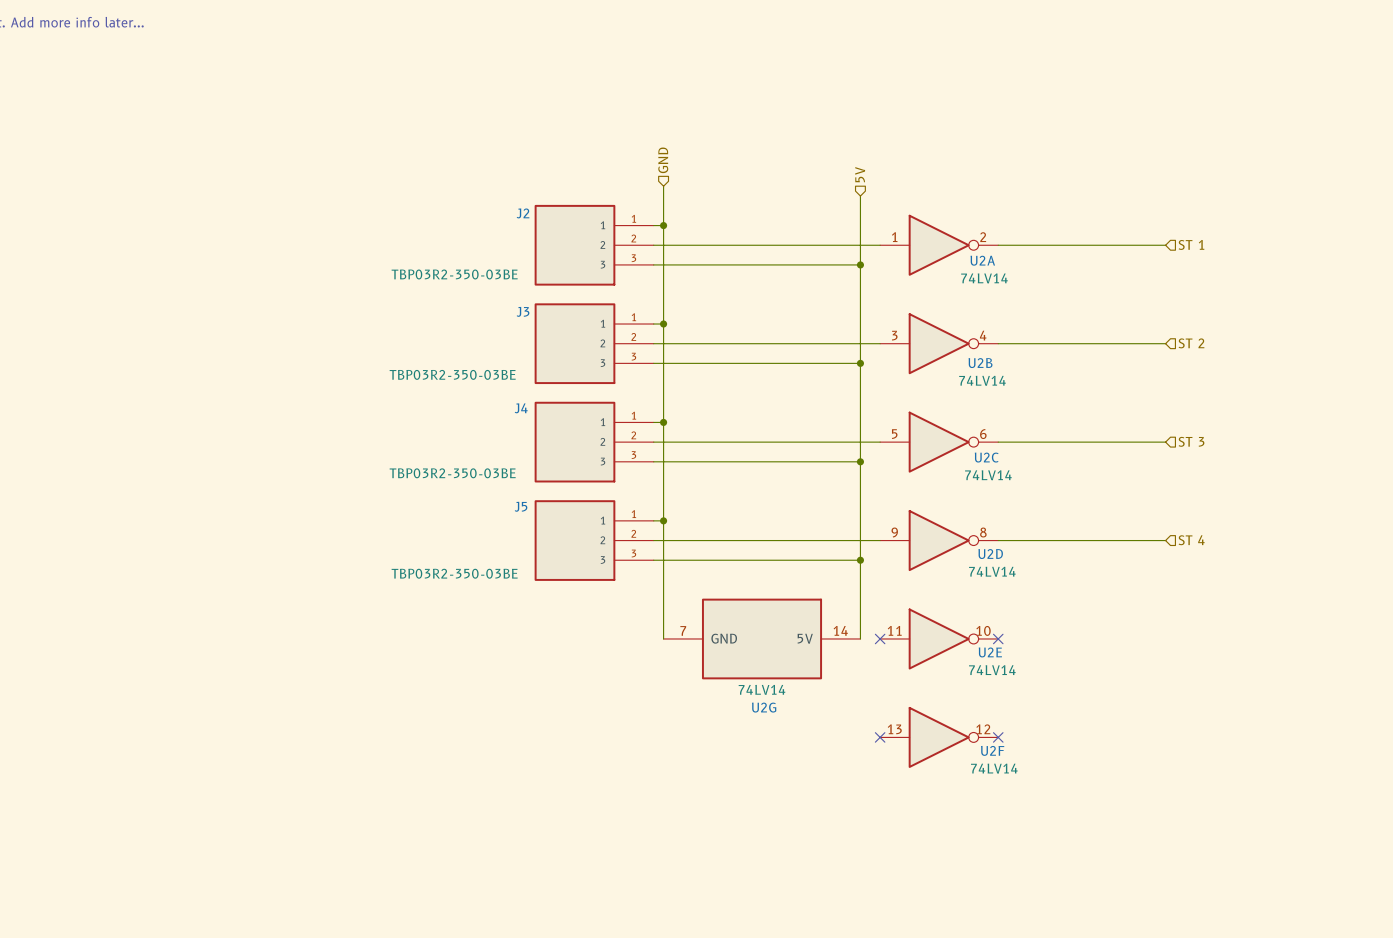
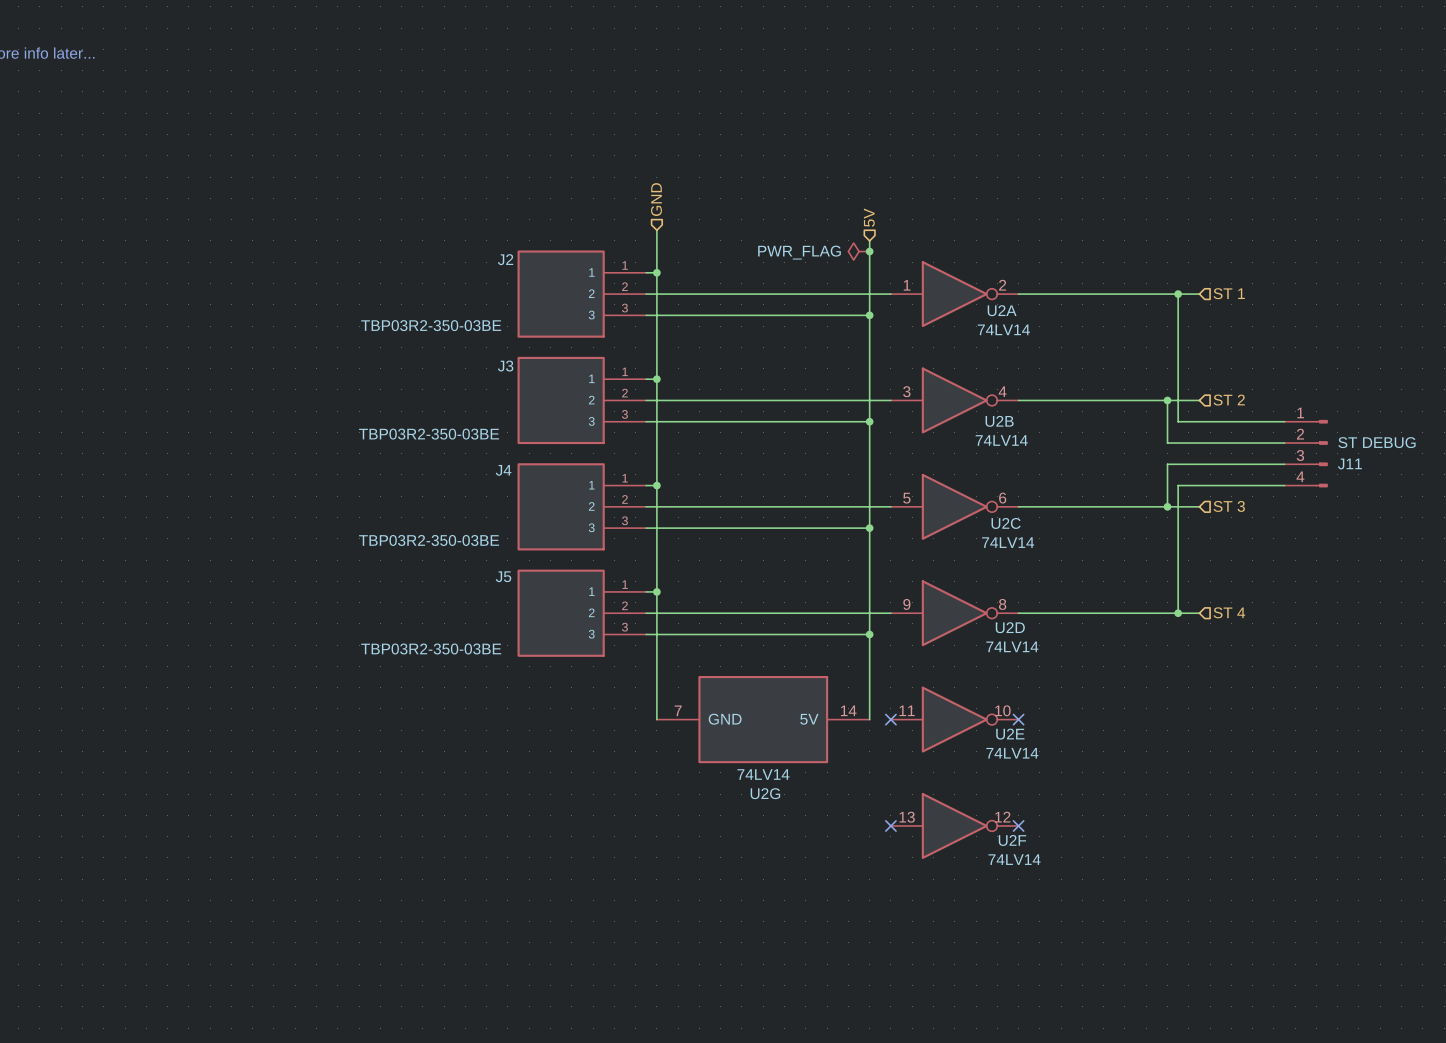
power symbol: none -> PWR_FLAG (859, 251)
junction: none -> (869, 251)
wire: none -> (1178, 294) (1178, 421) (1284, 421)
junction: none -> (1178, 294)
wire: none -> (1167, 400) (1167, 443) (1284, 443)
junction: none -> (1167, 400)
J11: none -> ST DEBUG (1306, 453)
wire: none -> (1284, 464) (1167, 464) (1167, 506)
wire: none -> (1284, 485) (1178, 485) (1178, 613)
junction: none -> (1167, 506)
junction: none -> (1178, 613)

